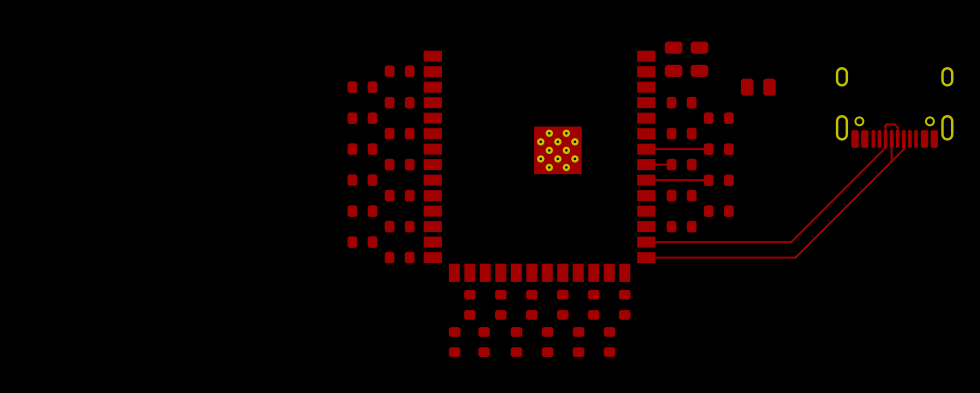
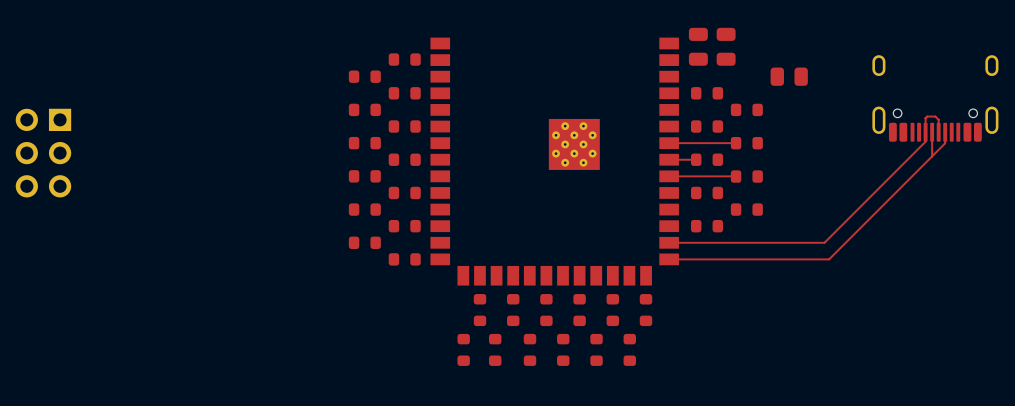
part: none -> (43, 153)

